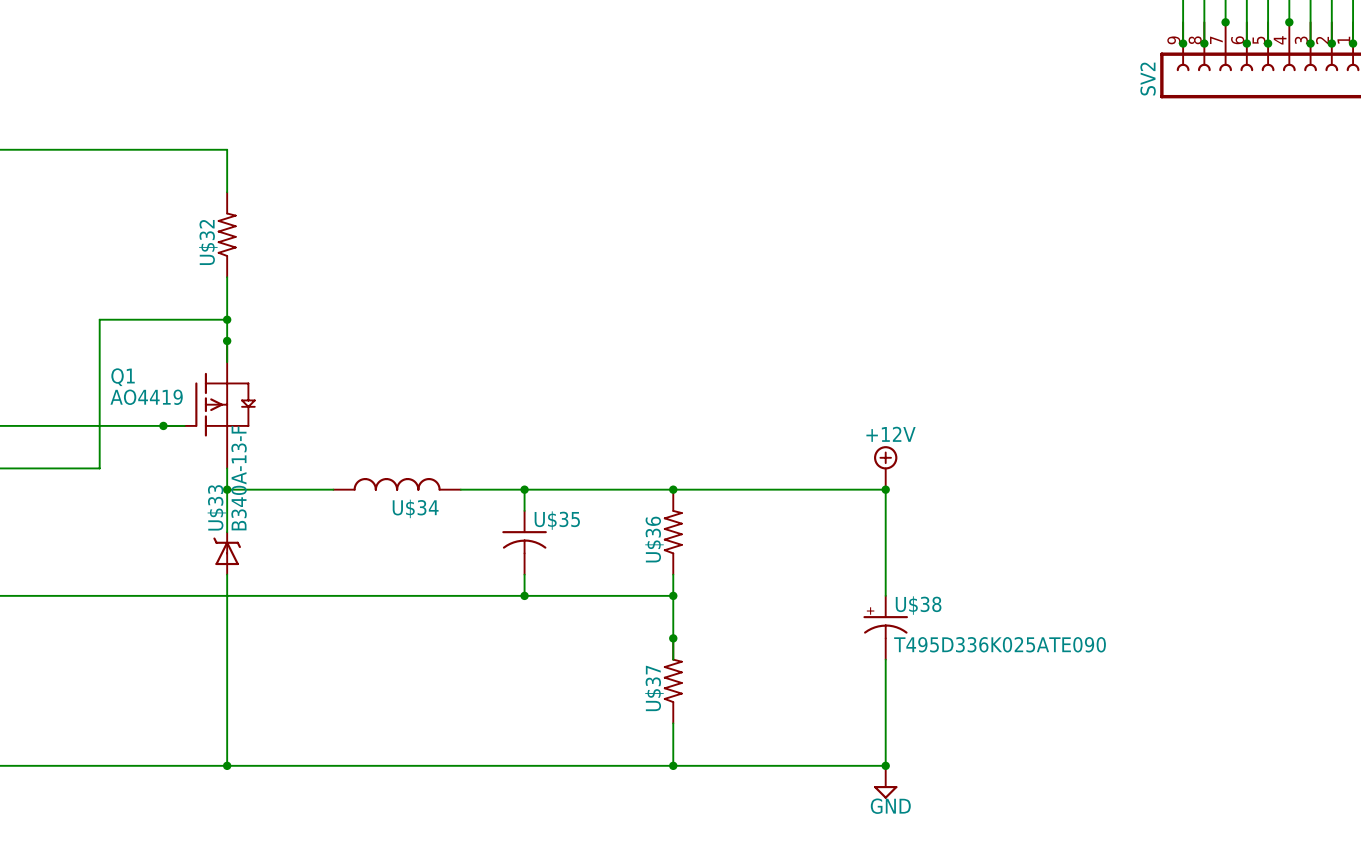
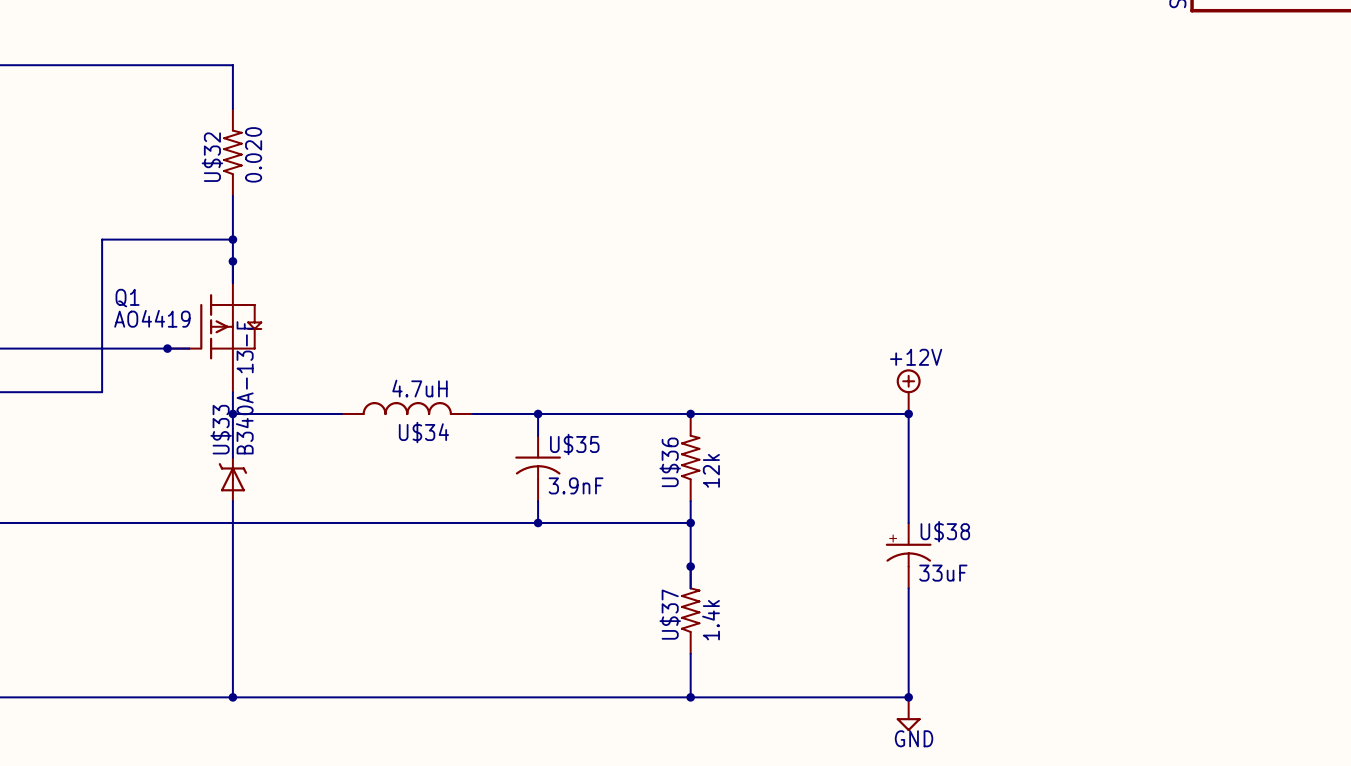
U$32 value: none -> 0.020 (253, 154)
U$34 value: none -> 4.7uH (420, 388)
U$36 value: none -> 12k (711, 470)
U$35 value: none -> 3.9nF (576, 485)
U$38 value: T495D336K025ATE090 (1000, 644) -> 33uF (943, 573)
U$37 value: none -> 1.4k (711, 620)

